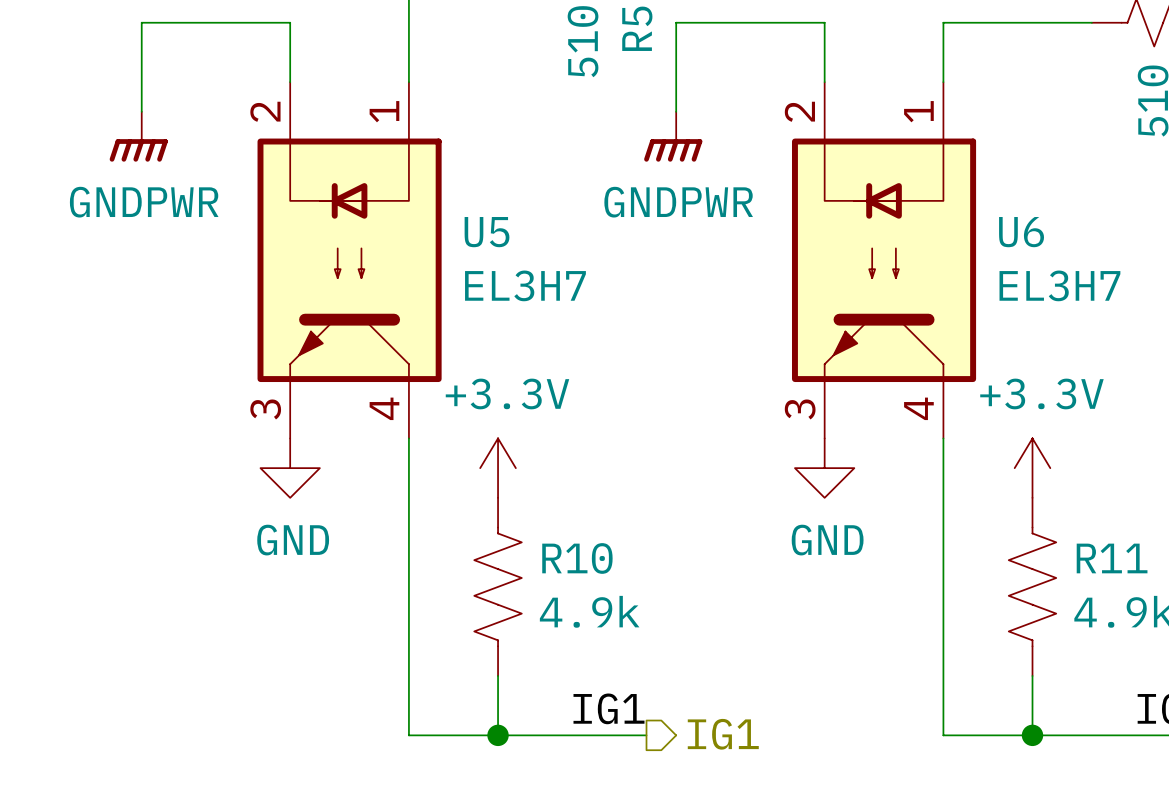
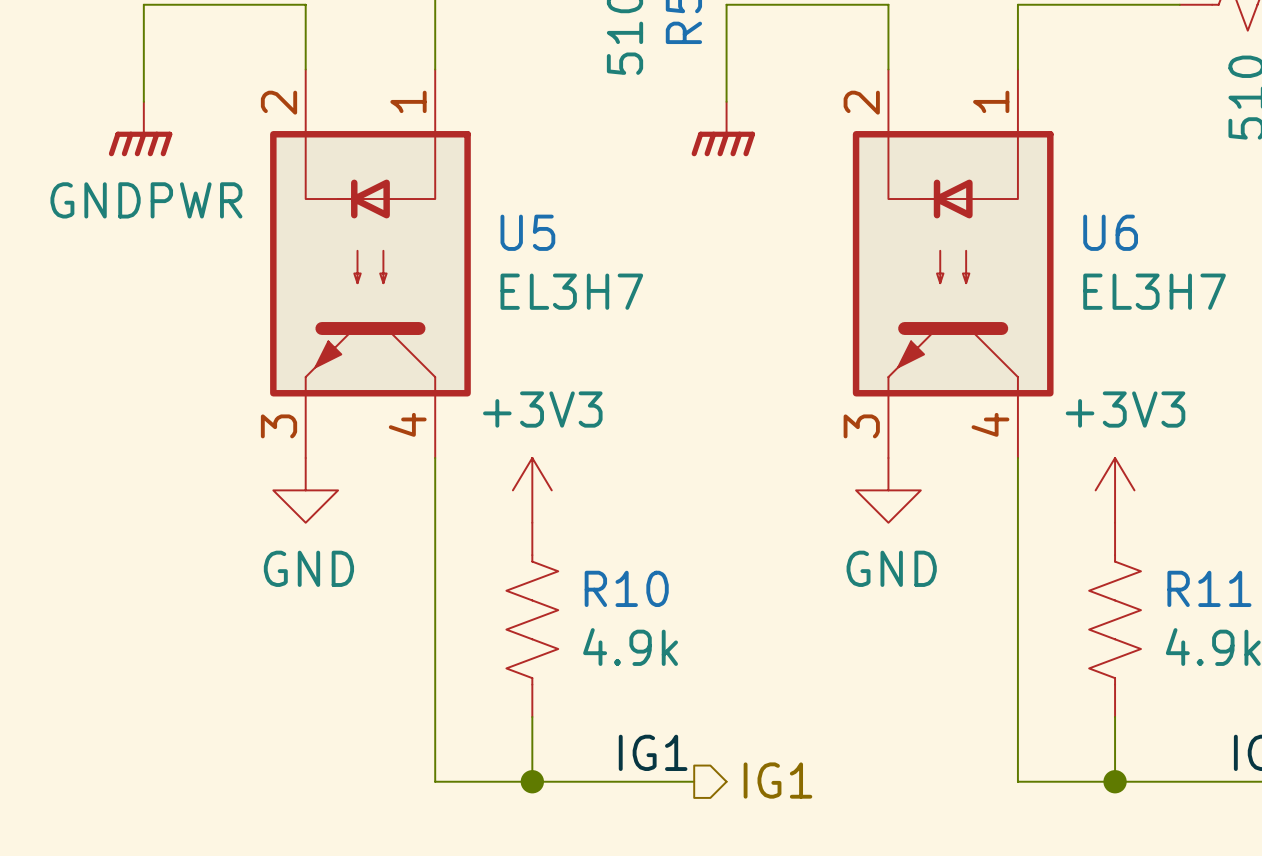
power symbol text: GNDPWR (678, 202) -> none
power symbol: +3.3V (498, 468) -> +3V3 (532, 490)
power symbol: +3.3V (1032, 468) -> +3V3 (1115, 490)

